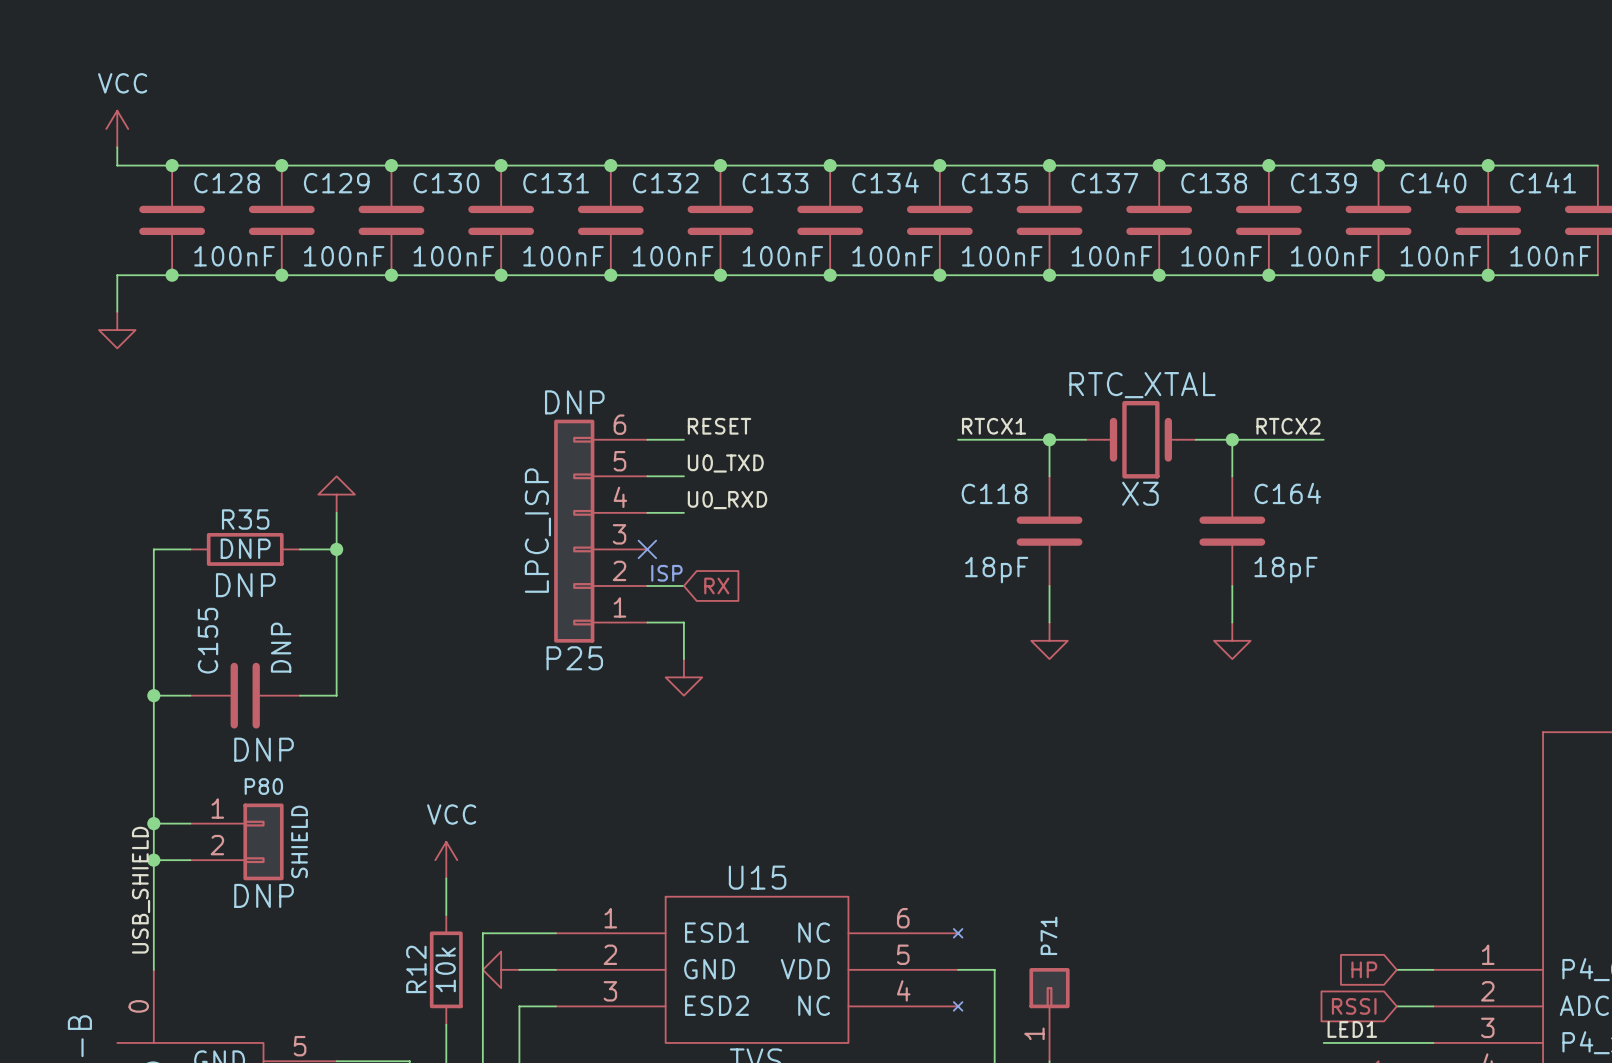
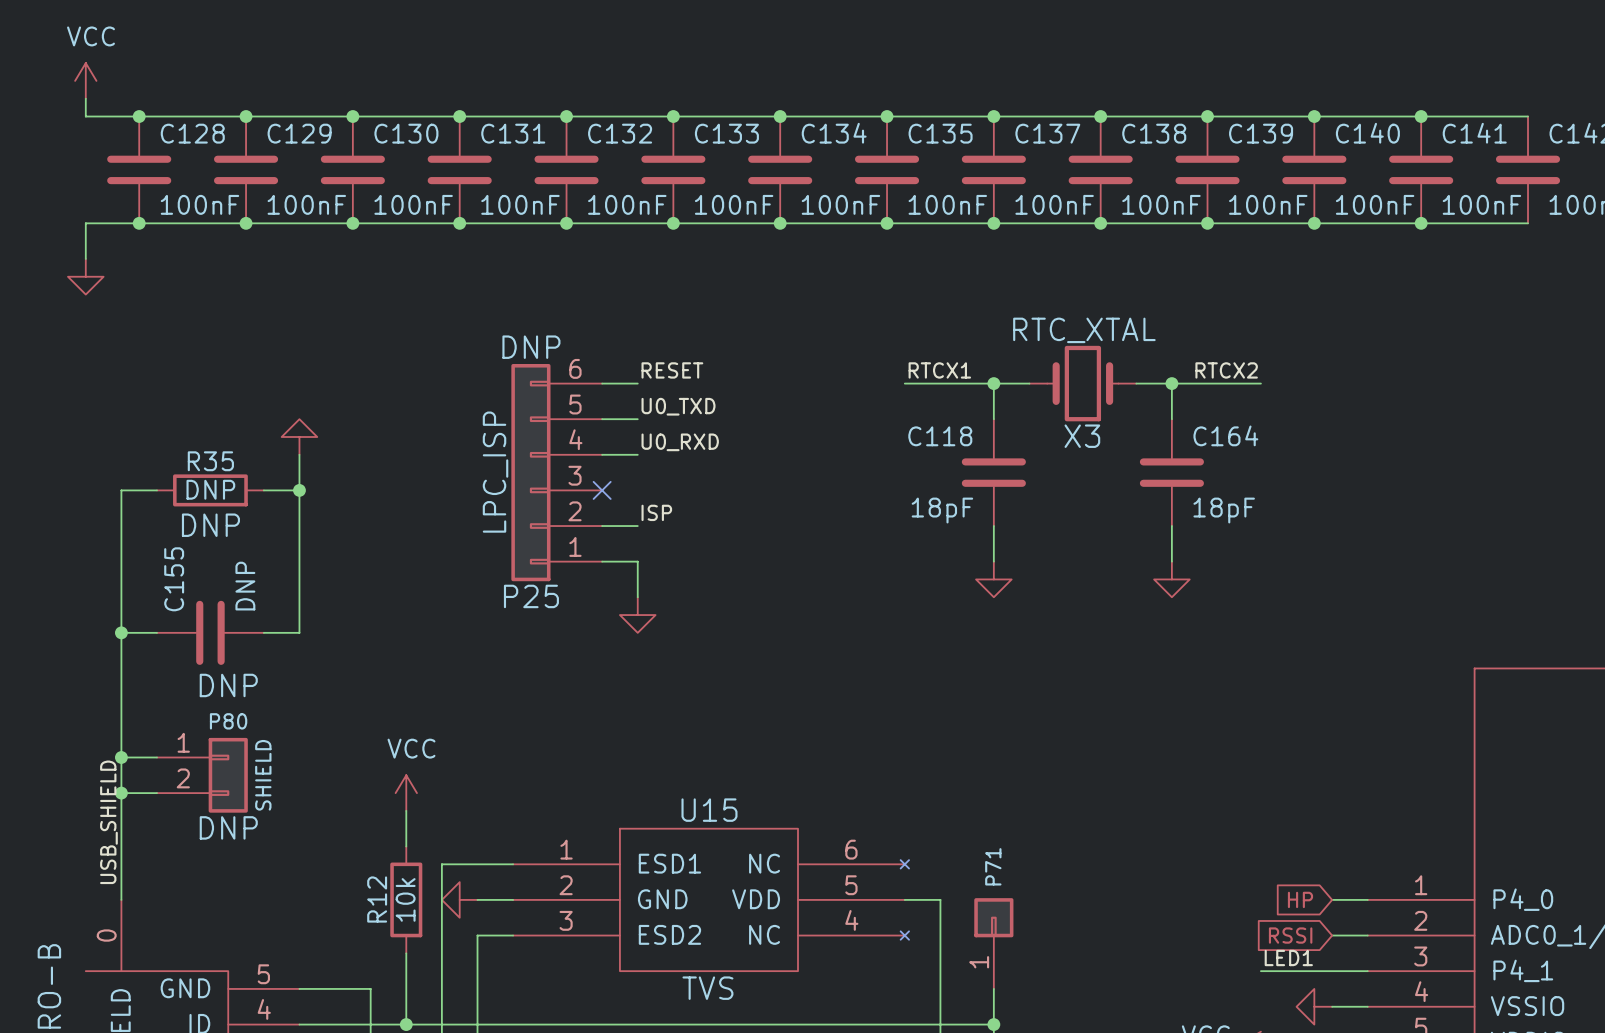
label: none -> ISP (656, 512)
text: ISP (666, 573) -> none
global label: RX (716, 585) -> none

